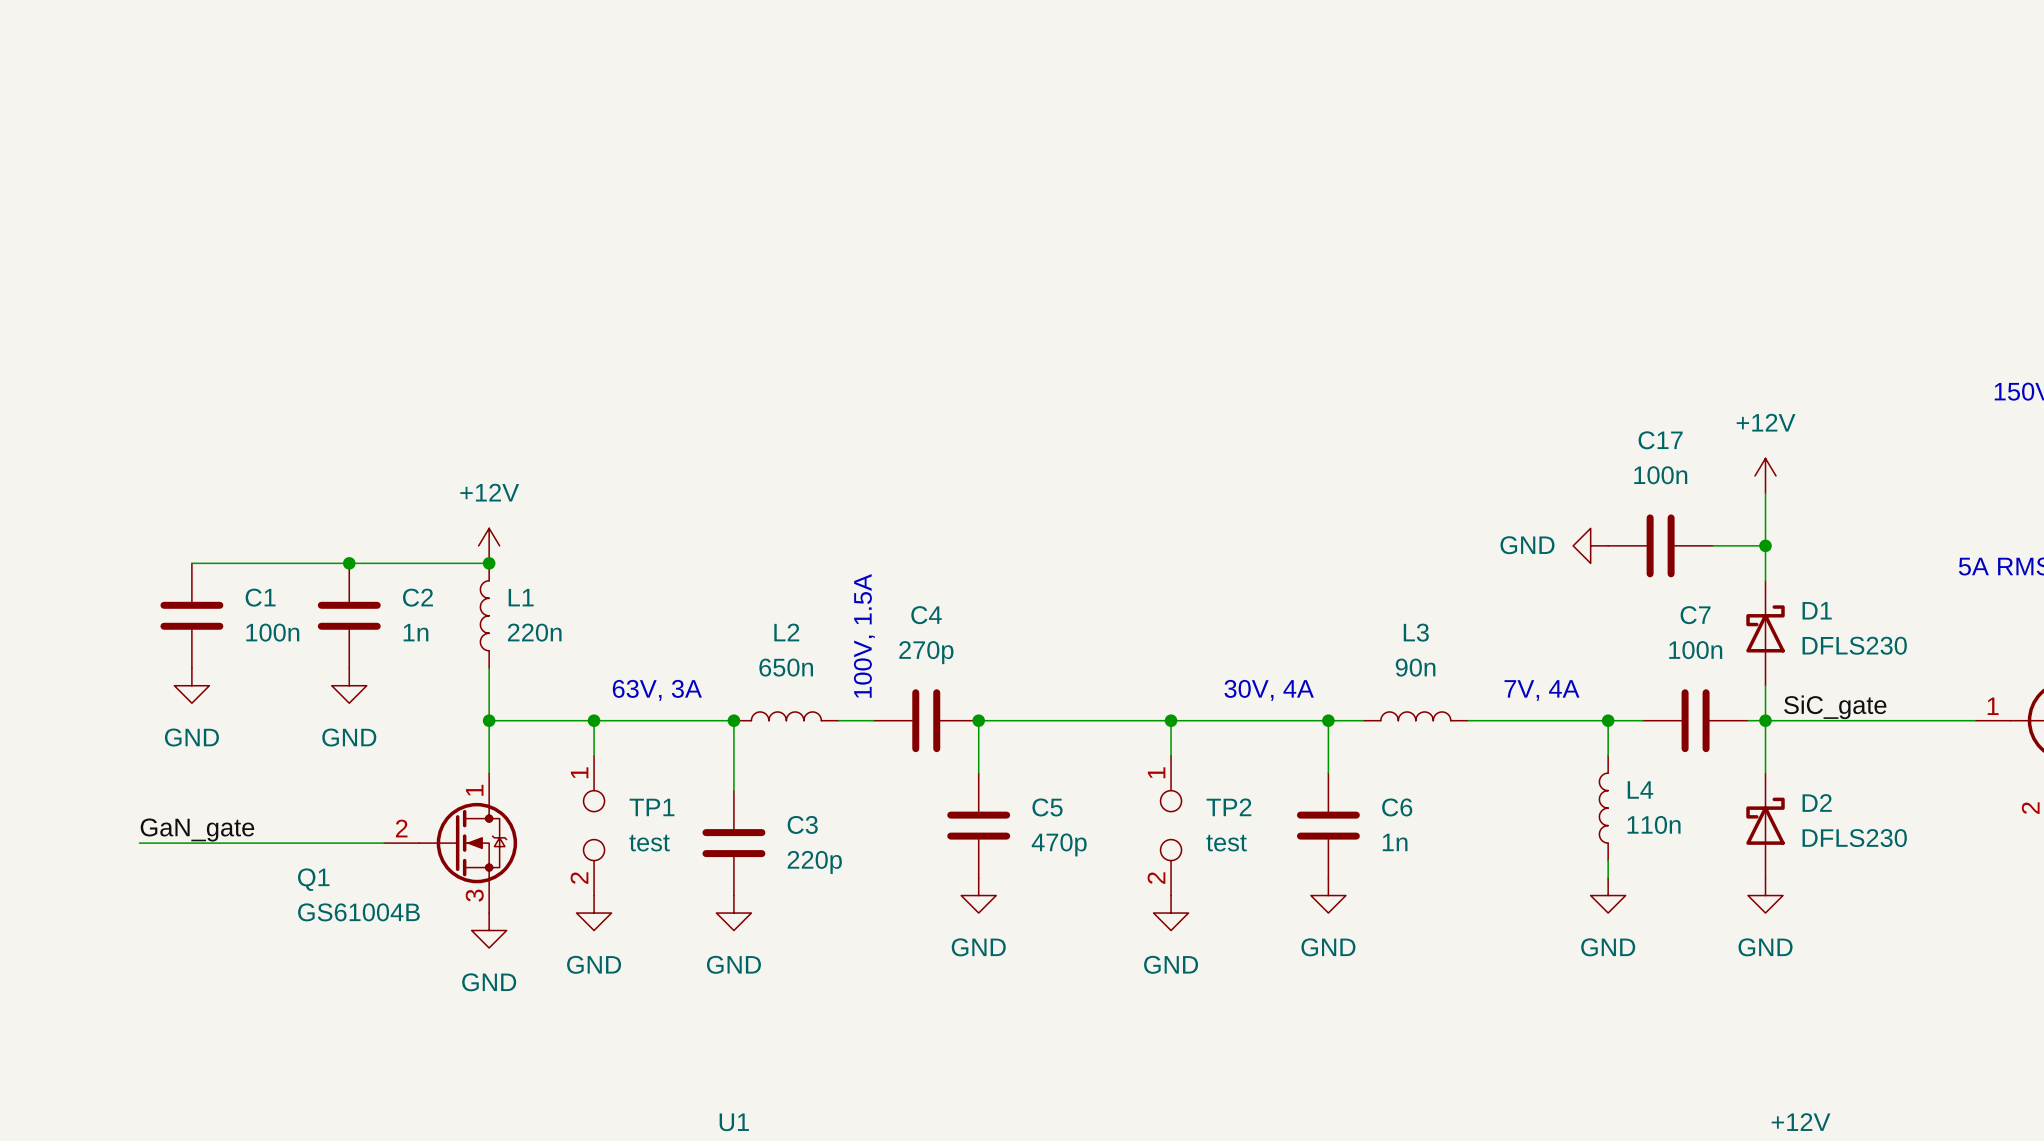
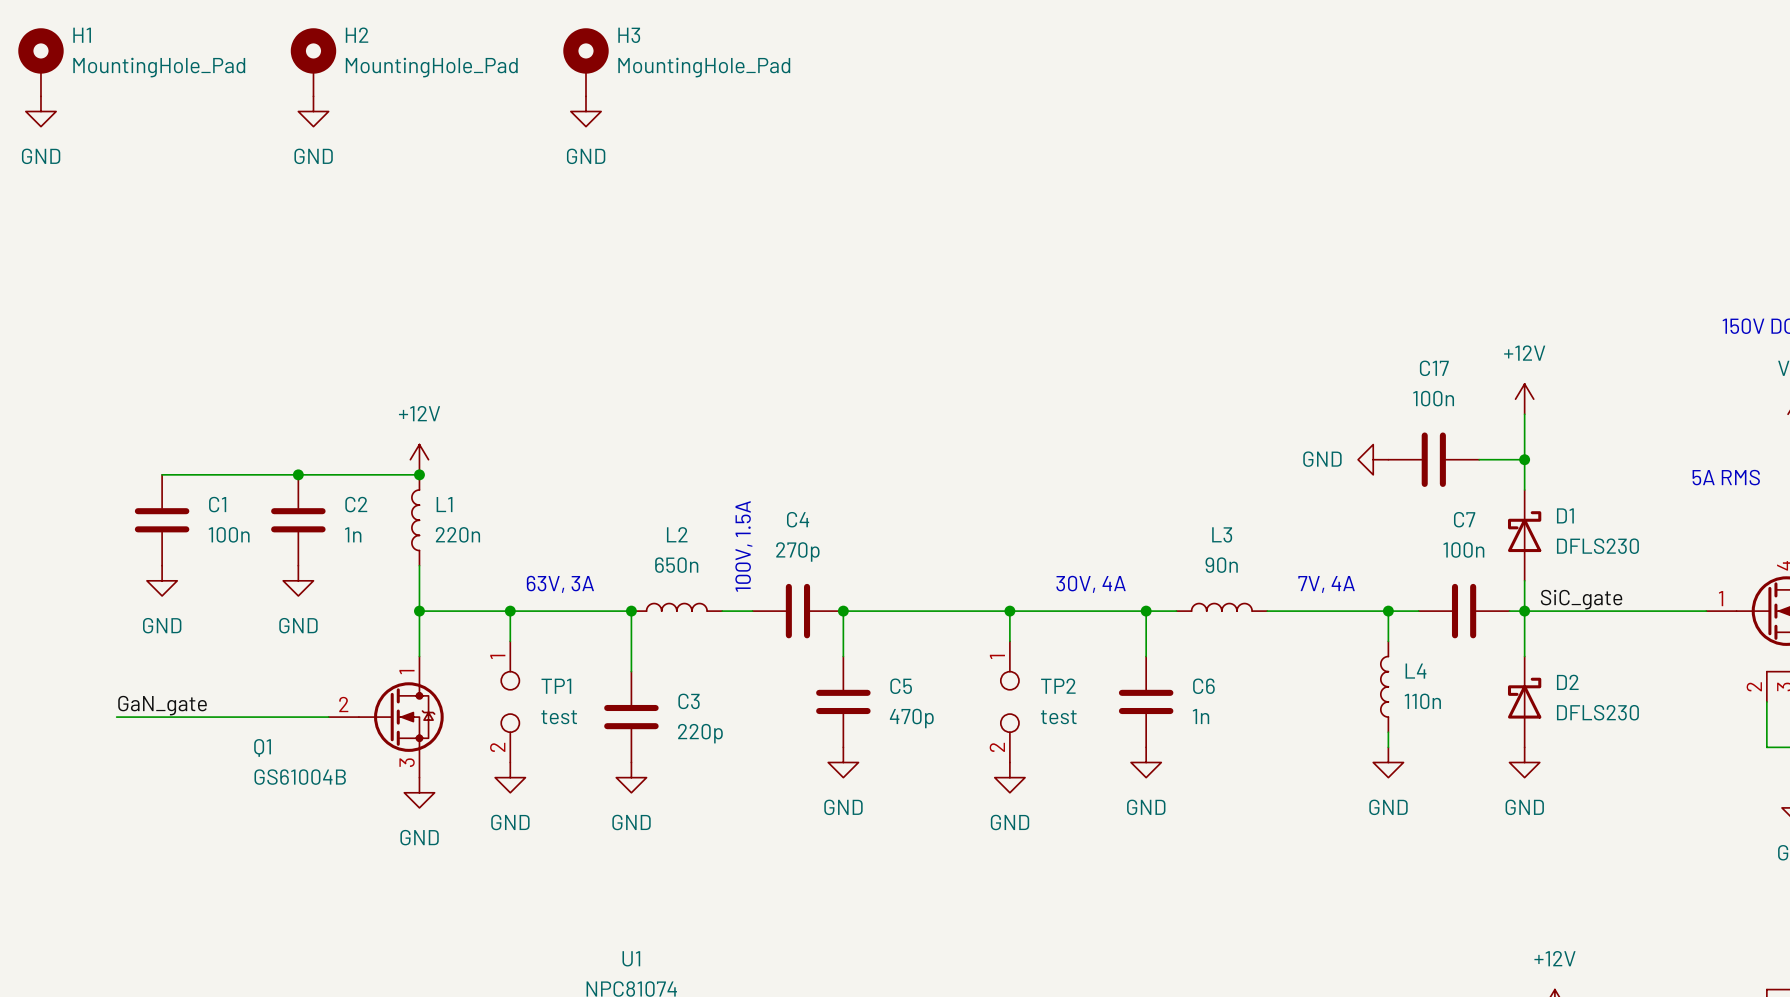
H1: none -> MountingHole_Pad (40, 62)
H2: none -> MountingHole_Pad (313, 62)
H3: none -> MountingHole_Pad (586, 62)
power symbol: none -> GND (40, 111)
power symbol: none -> GND (313, 111)
power symbol: none -> GND (586, 111)

